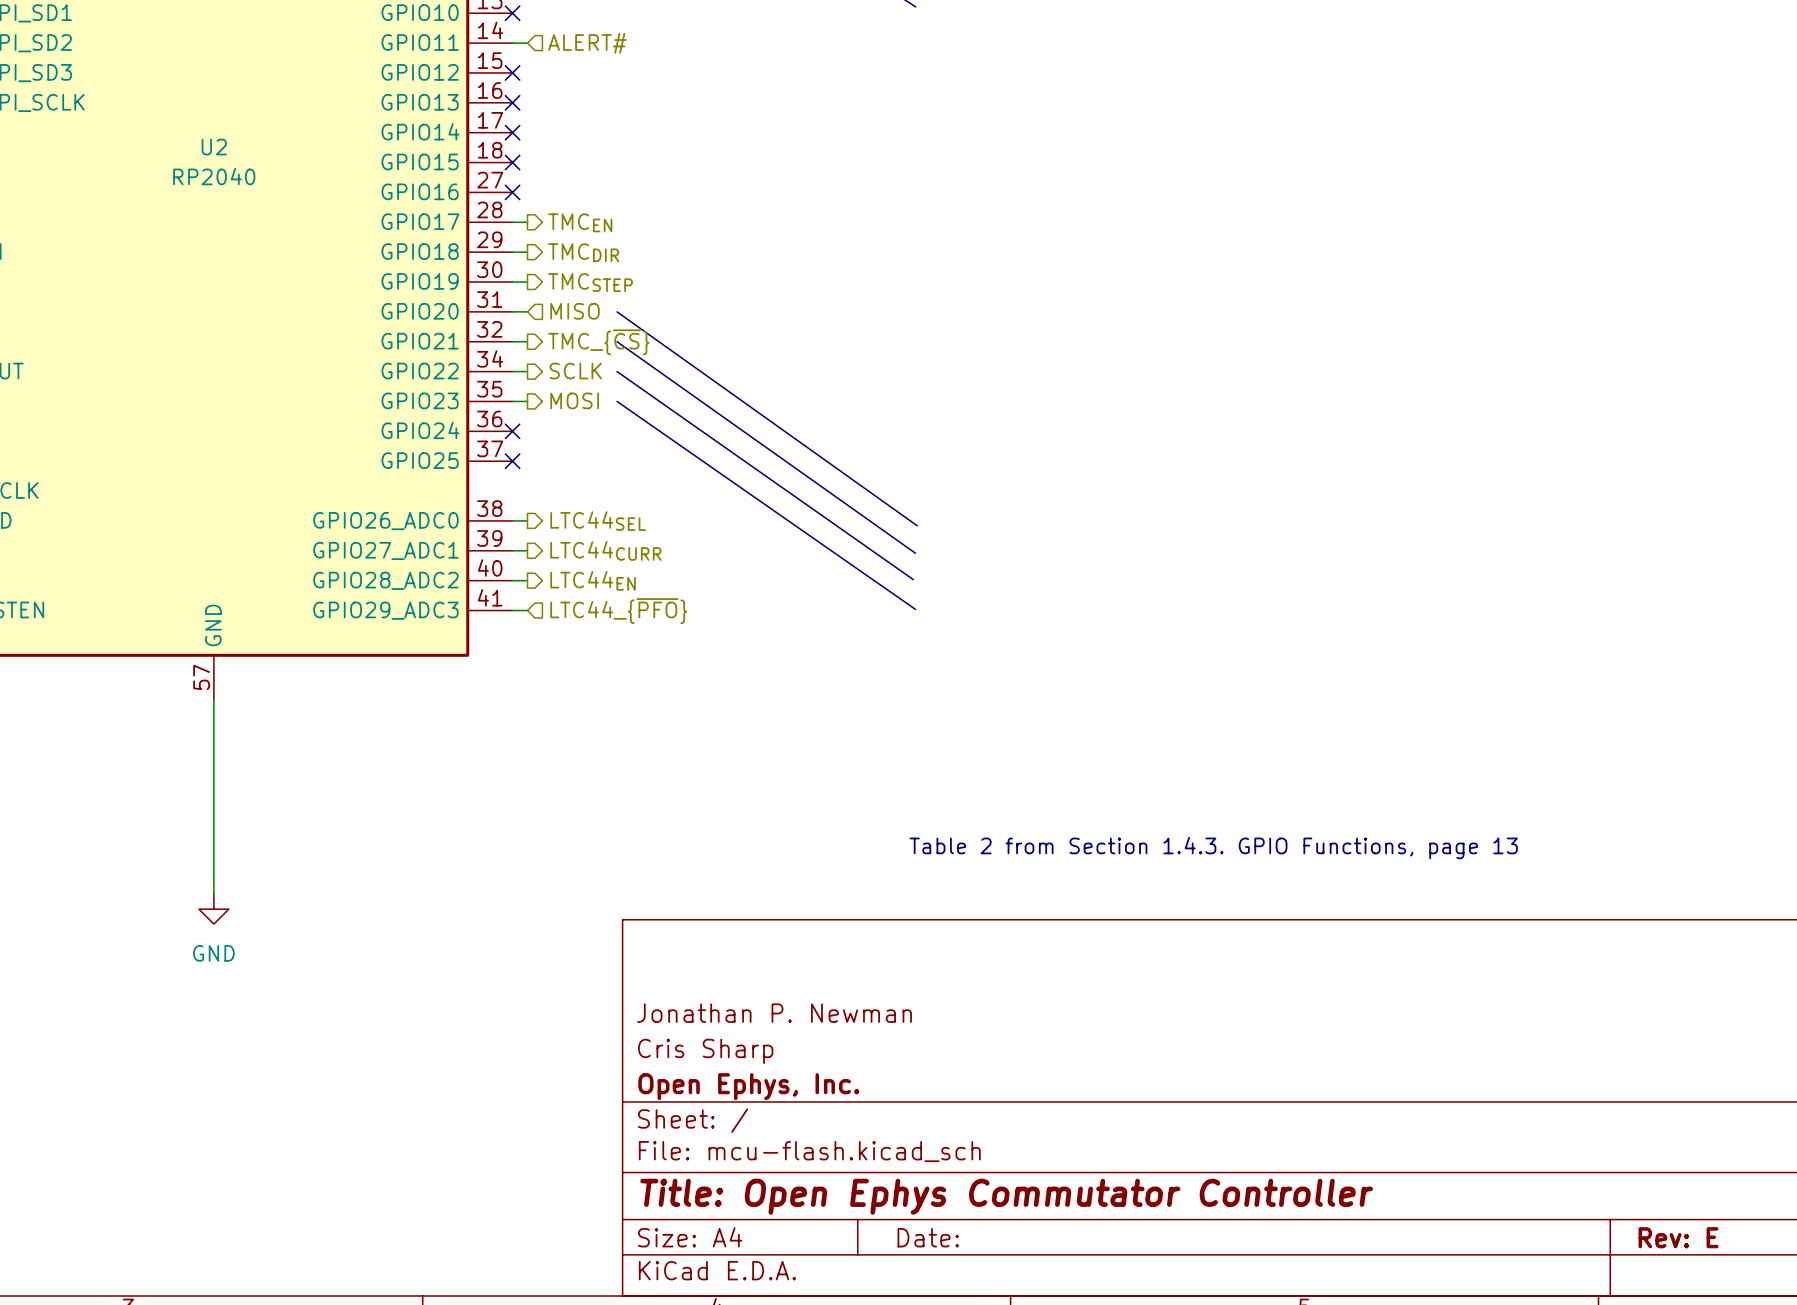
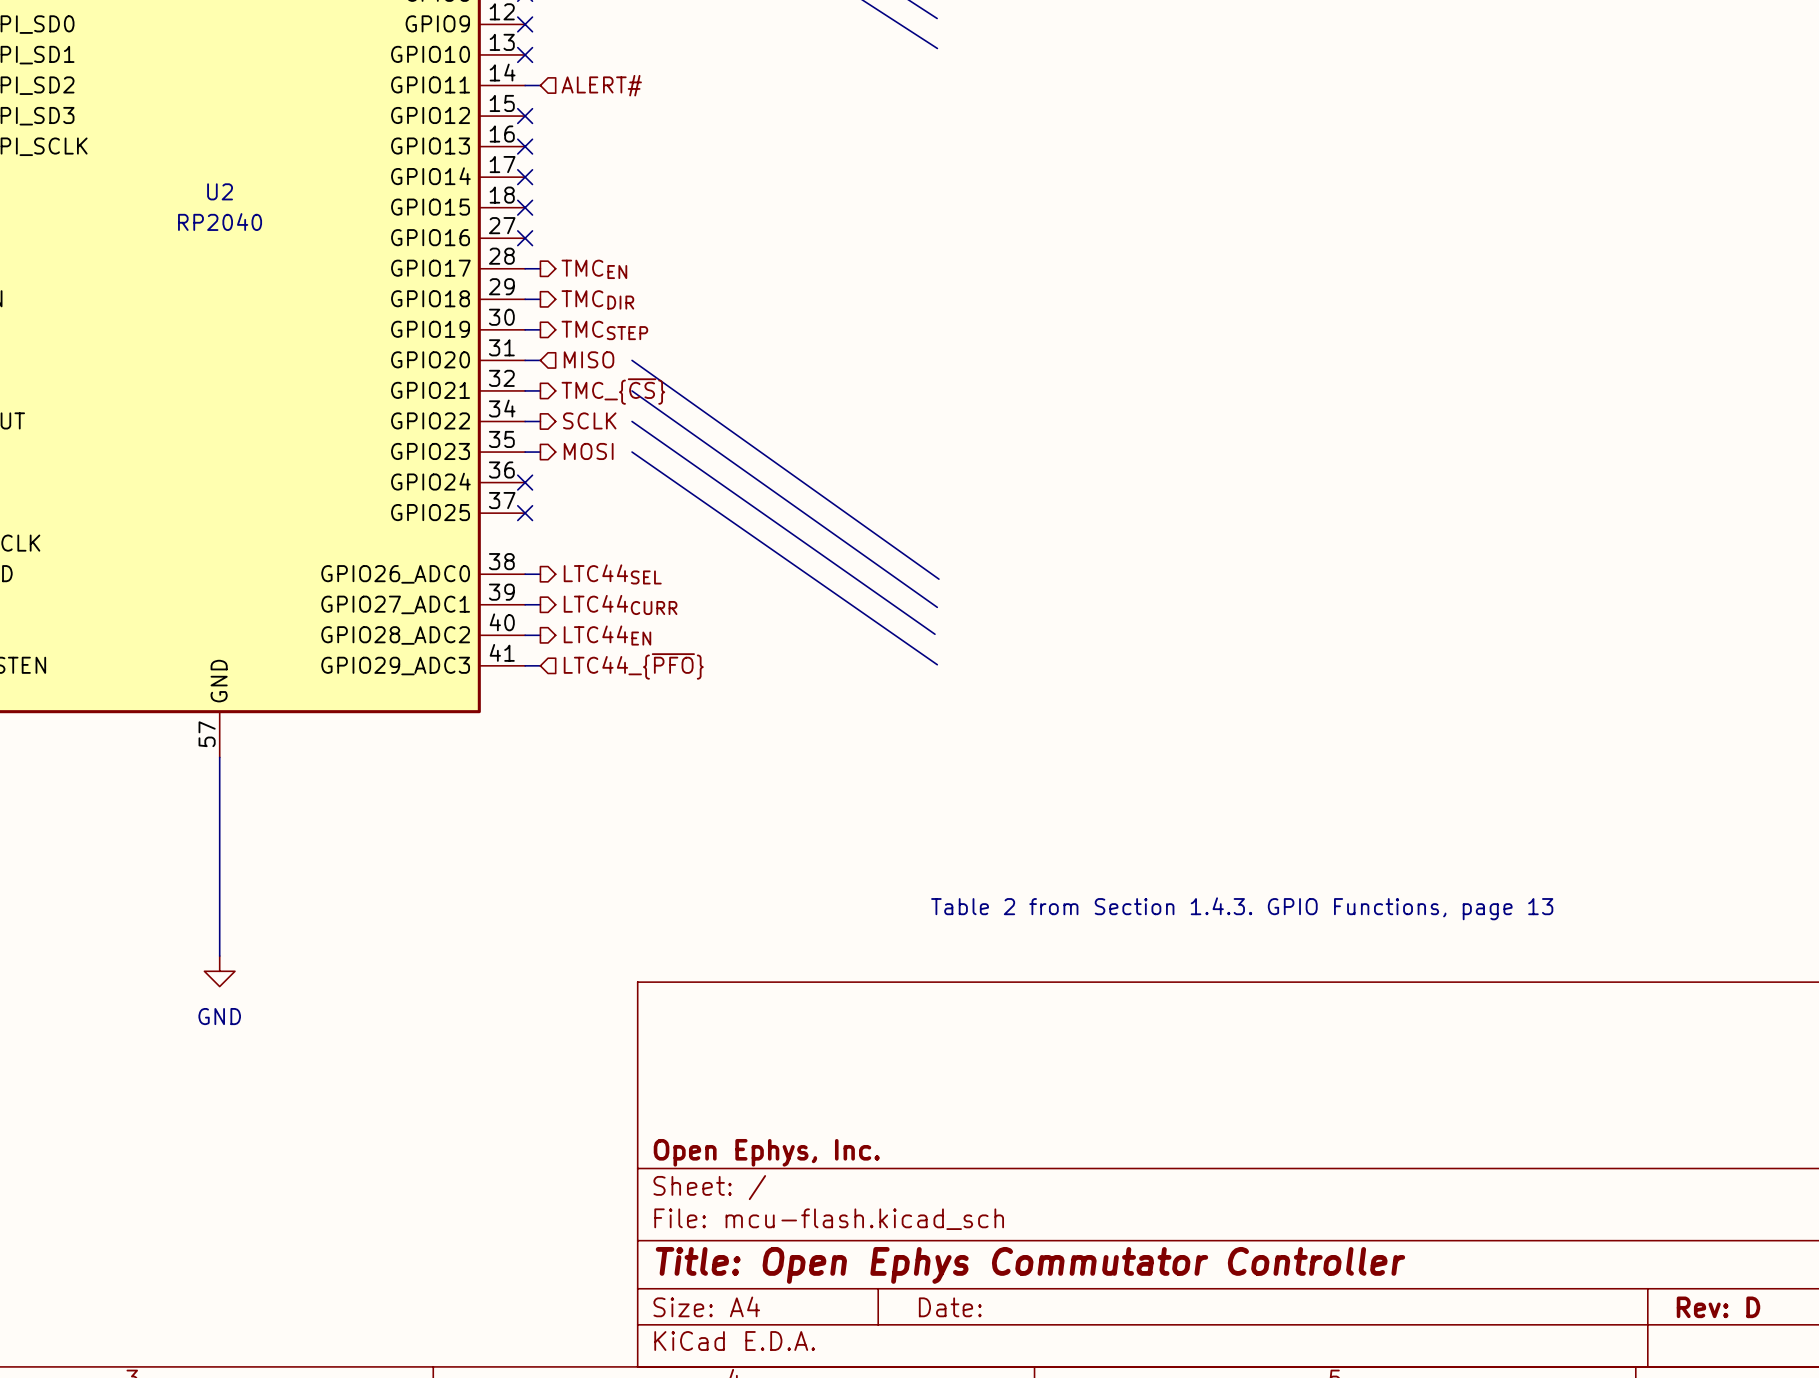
title block: Jonathan P. Newman (774, 1013) -> none
title block: Cris Sharp (705, 1051) -> none
title block: Rev: E (1678, 1237) -> Rev: D (1718, 1307)

